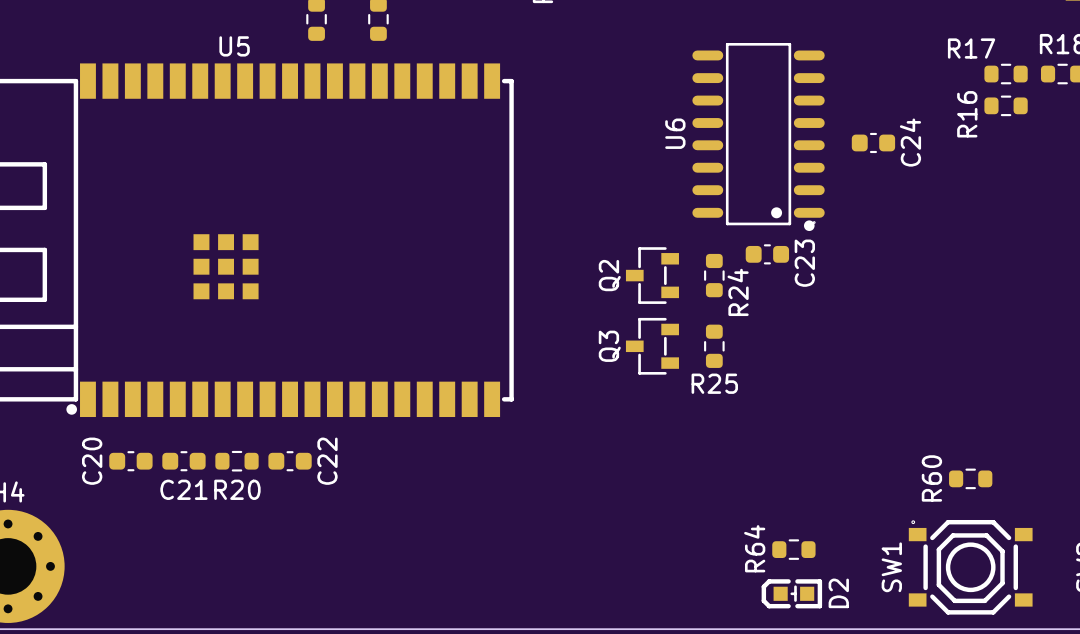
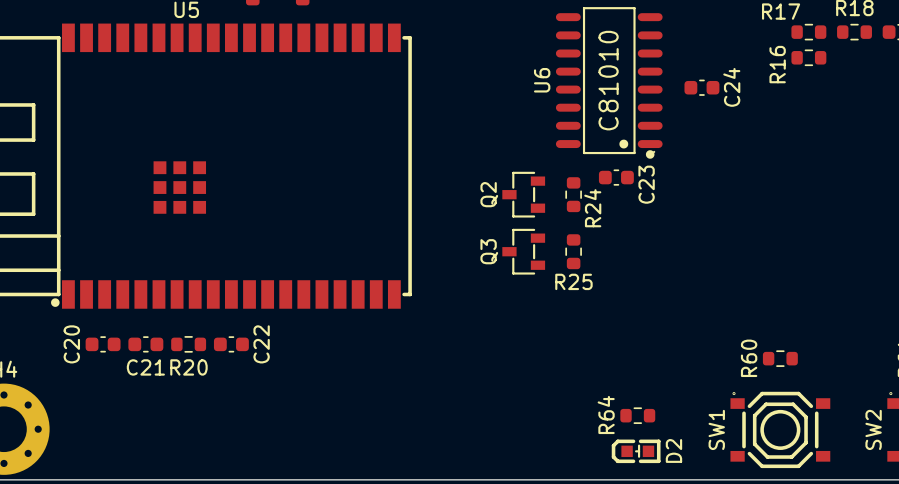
U6 text: none -> C81010 (608, 80)

